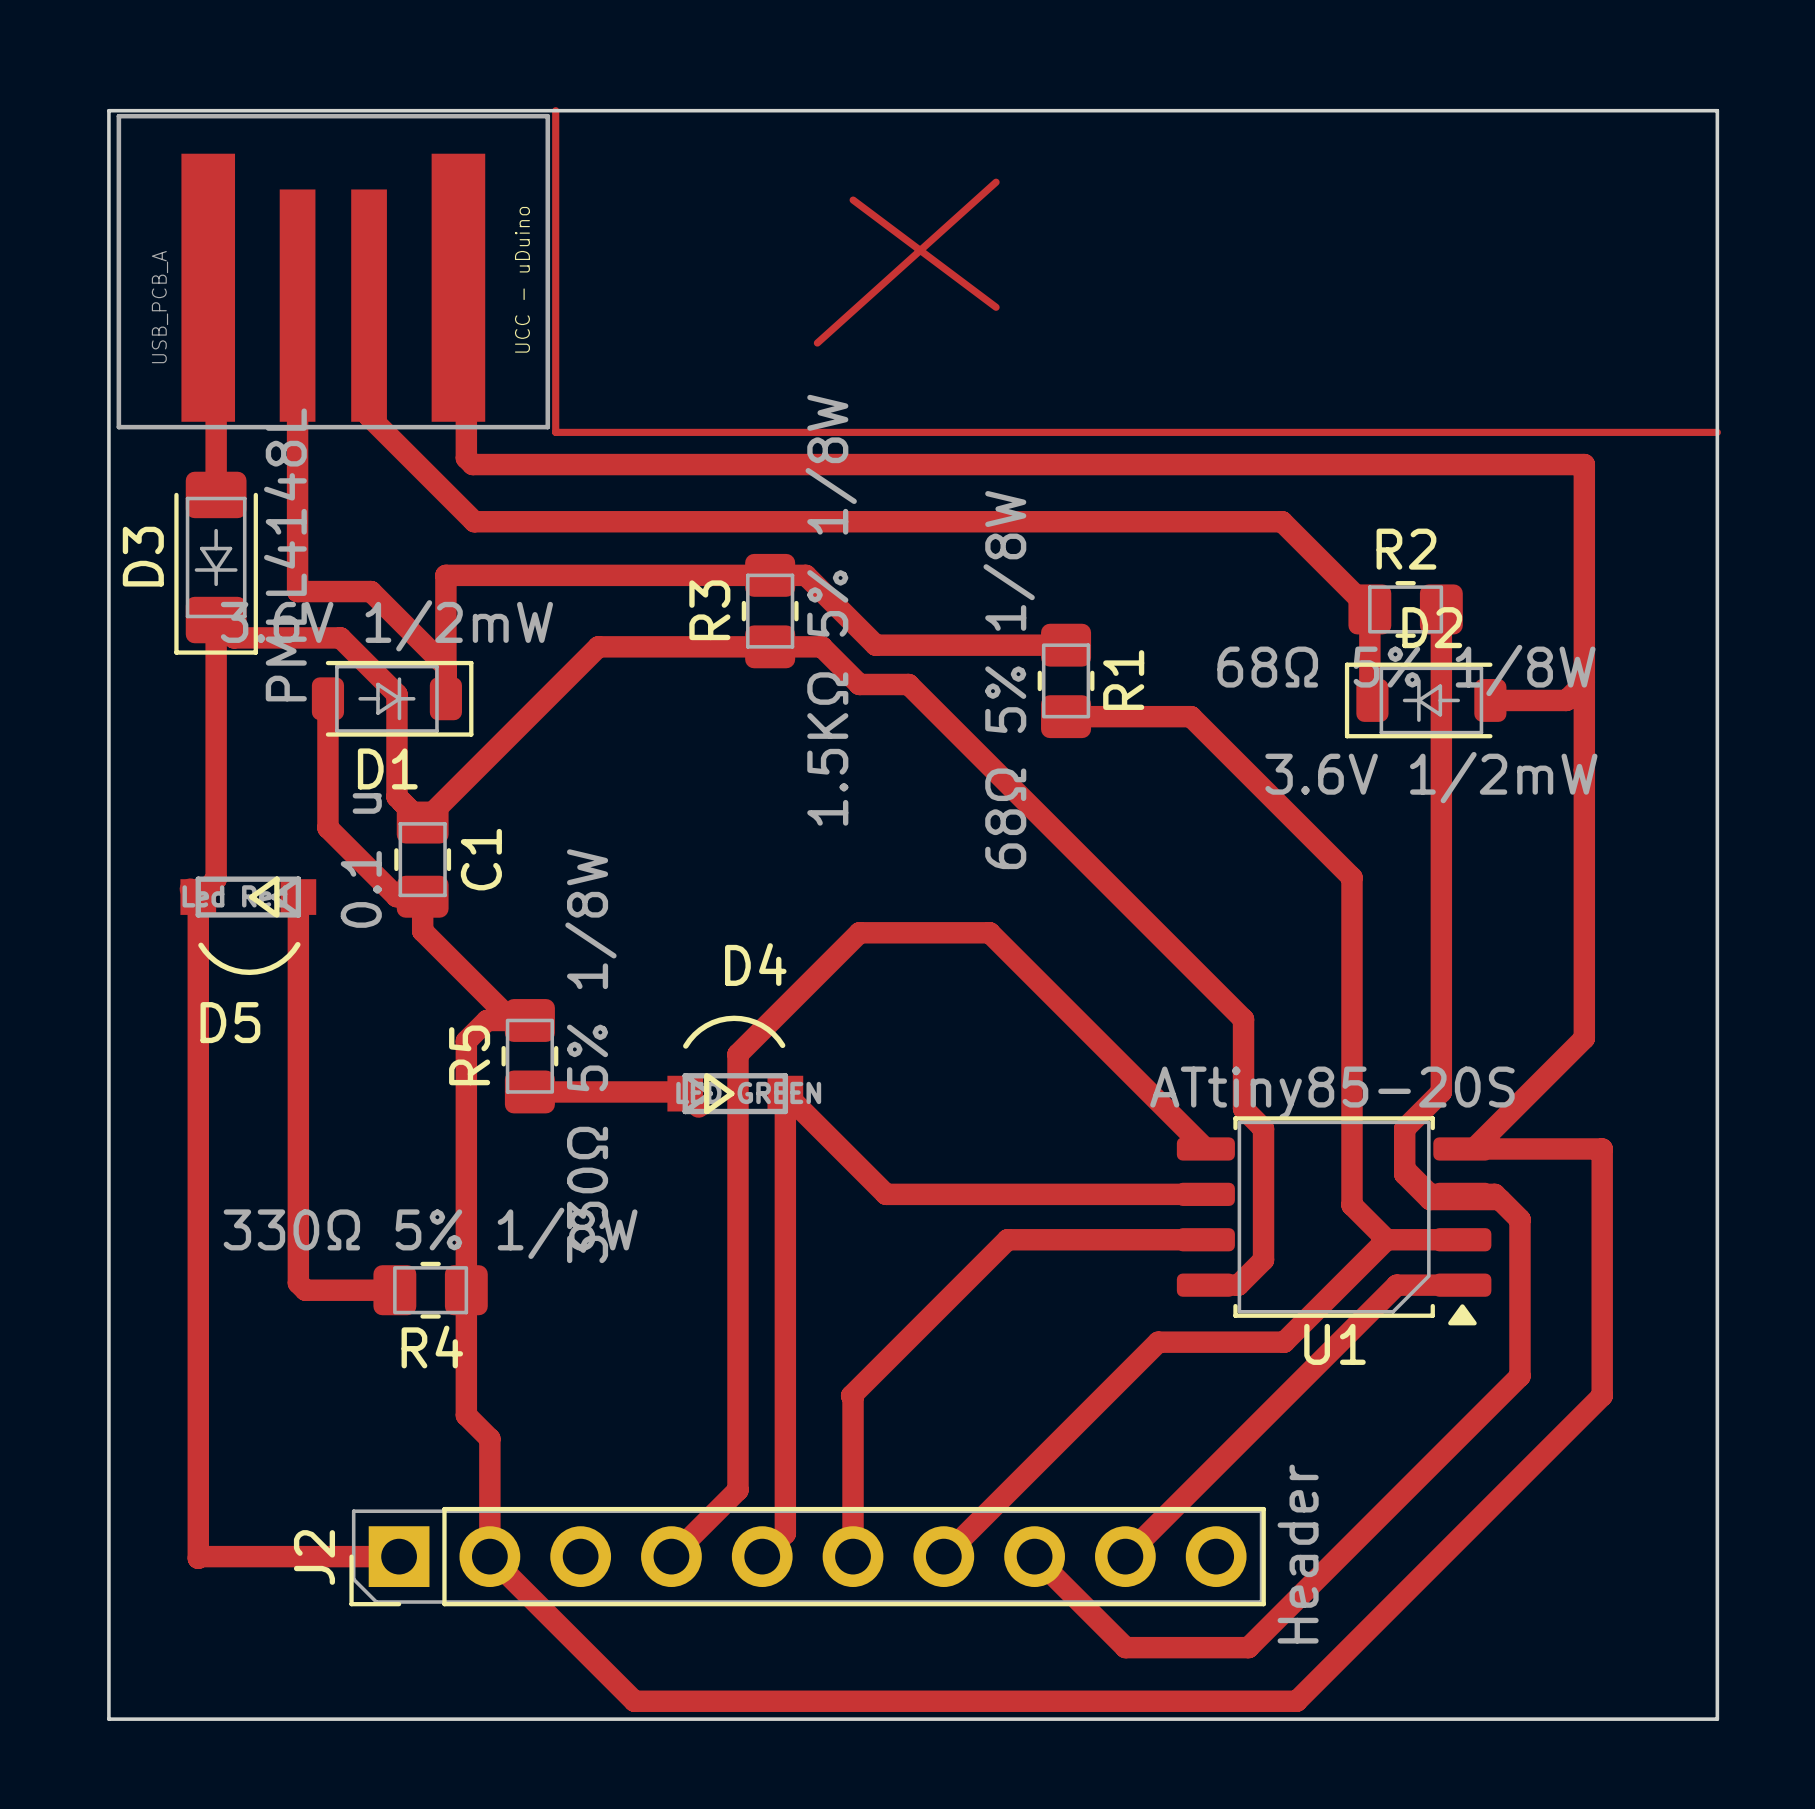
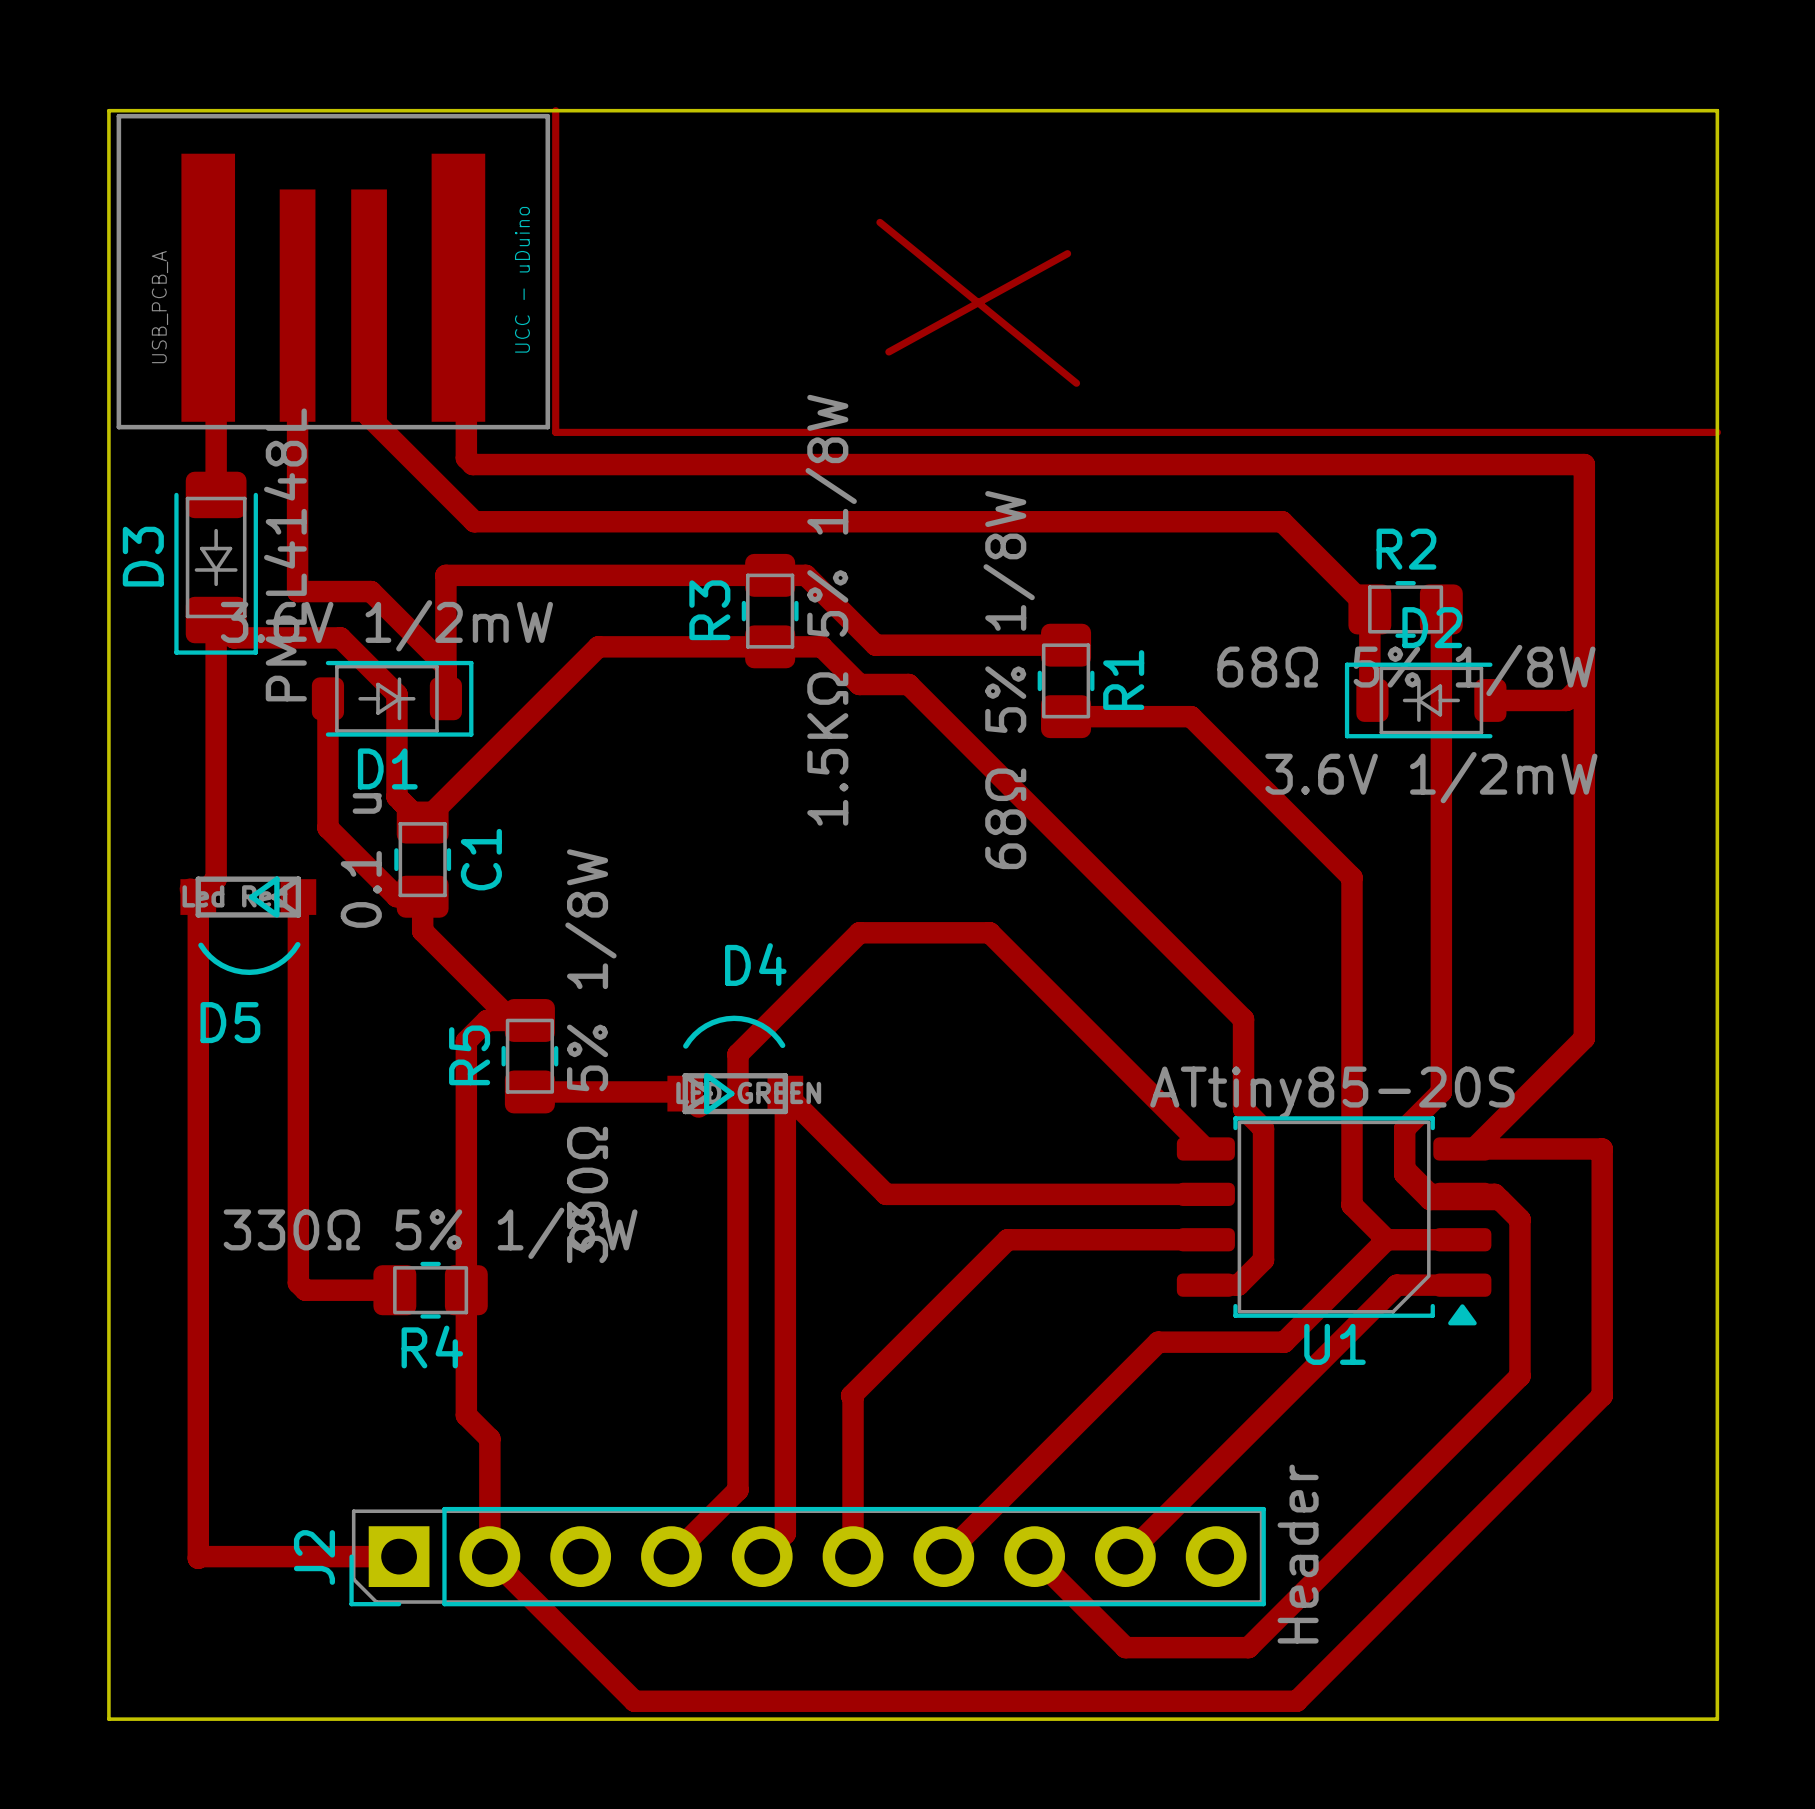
top track: (996, 182) (817, 343) -> none
top track: (853, 200) (996, 307) -> none
top track: none -> (879, 222) (1076, 383)
top track: none -> (1067, 253) (888, 351)

